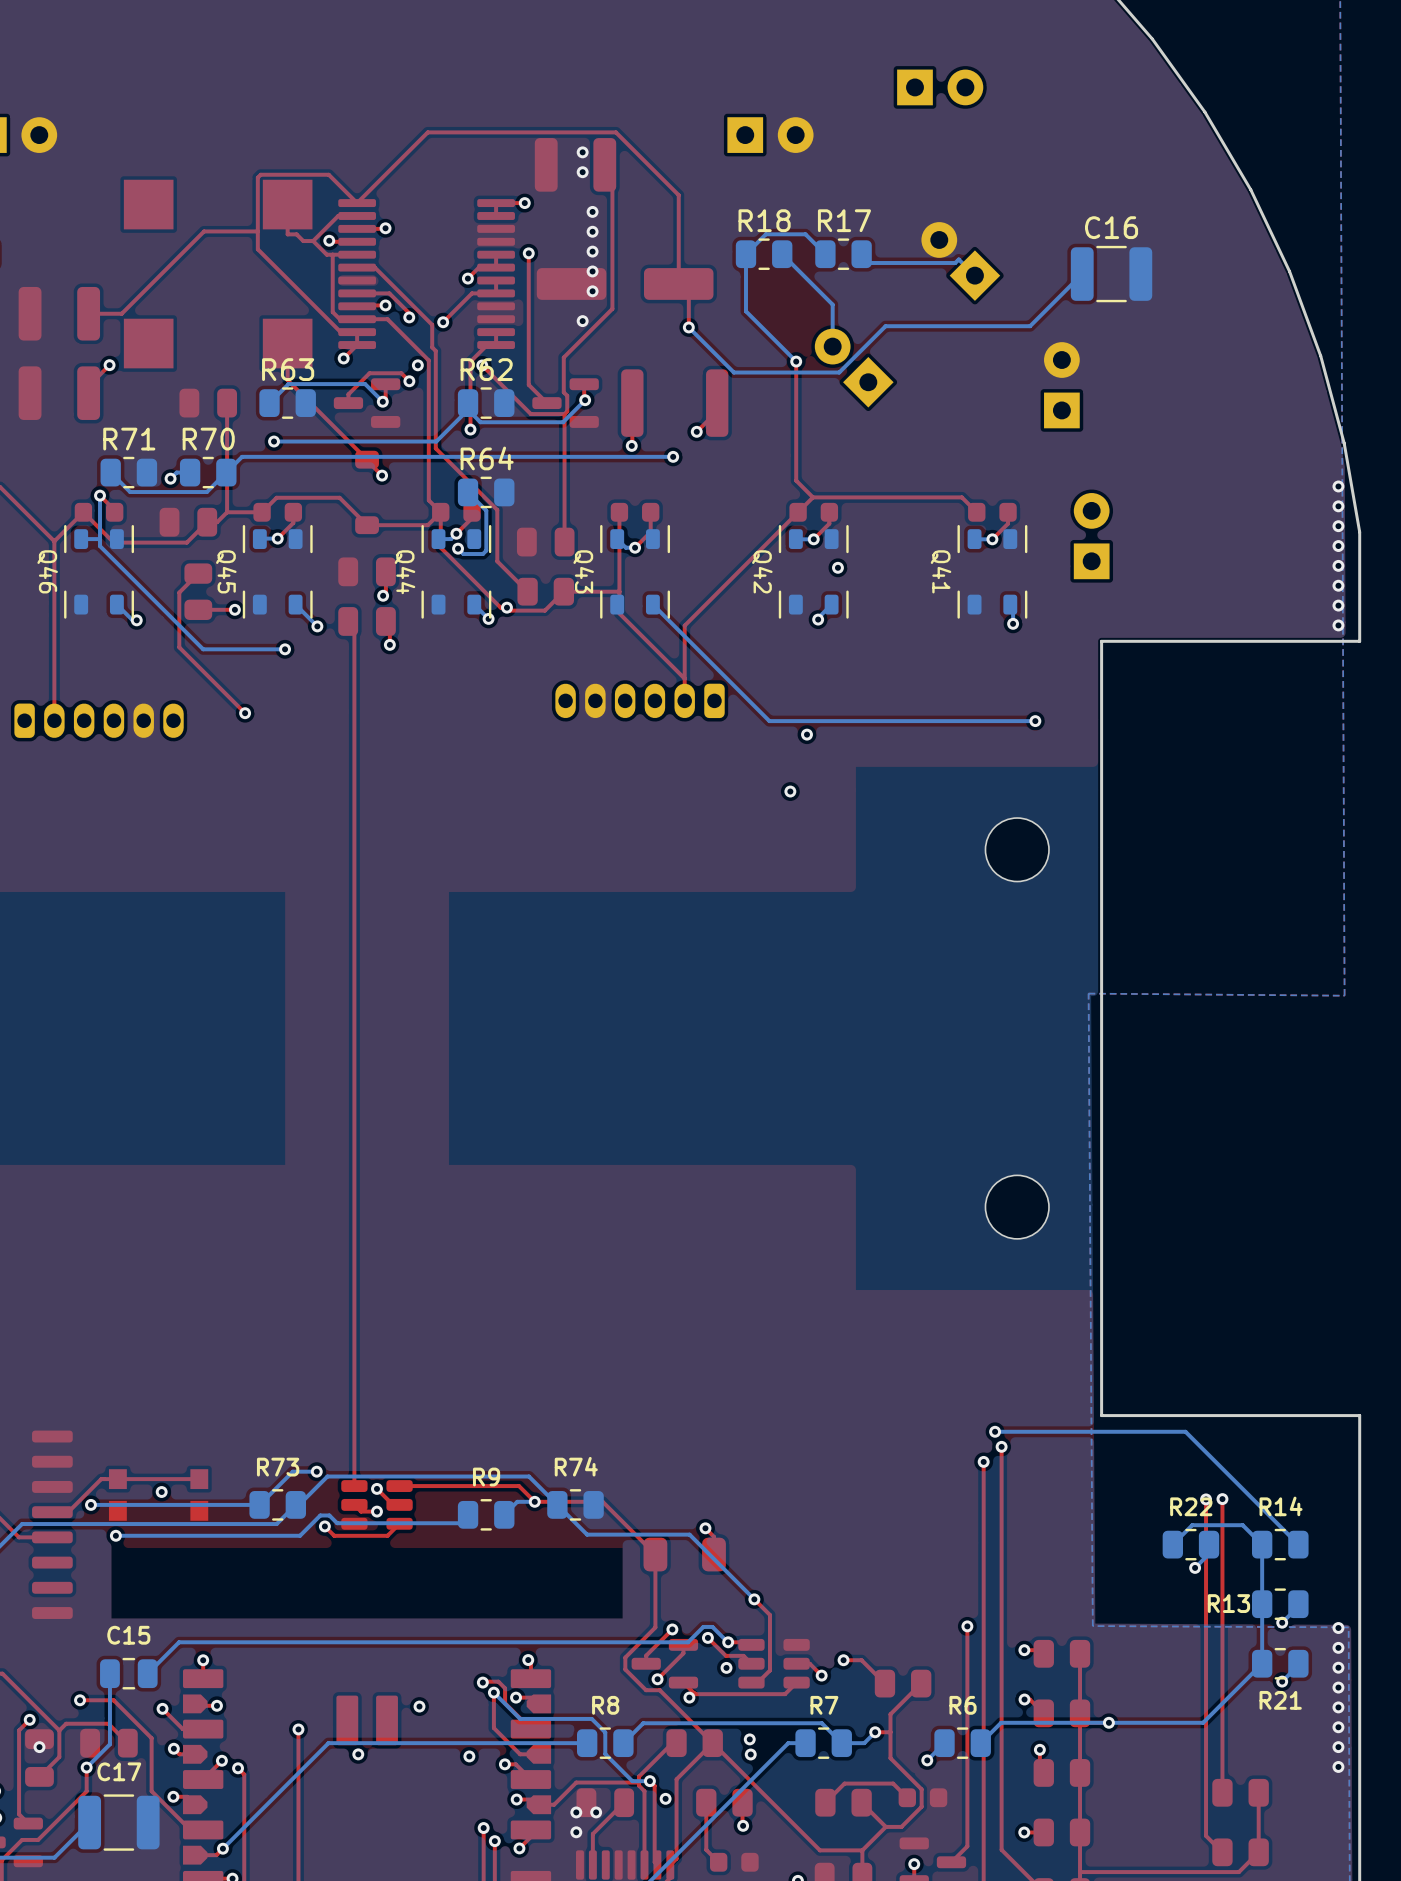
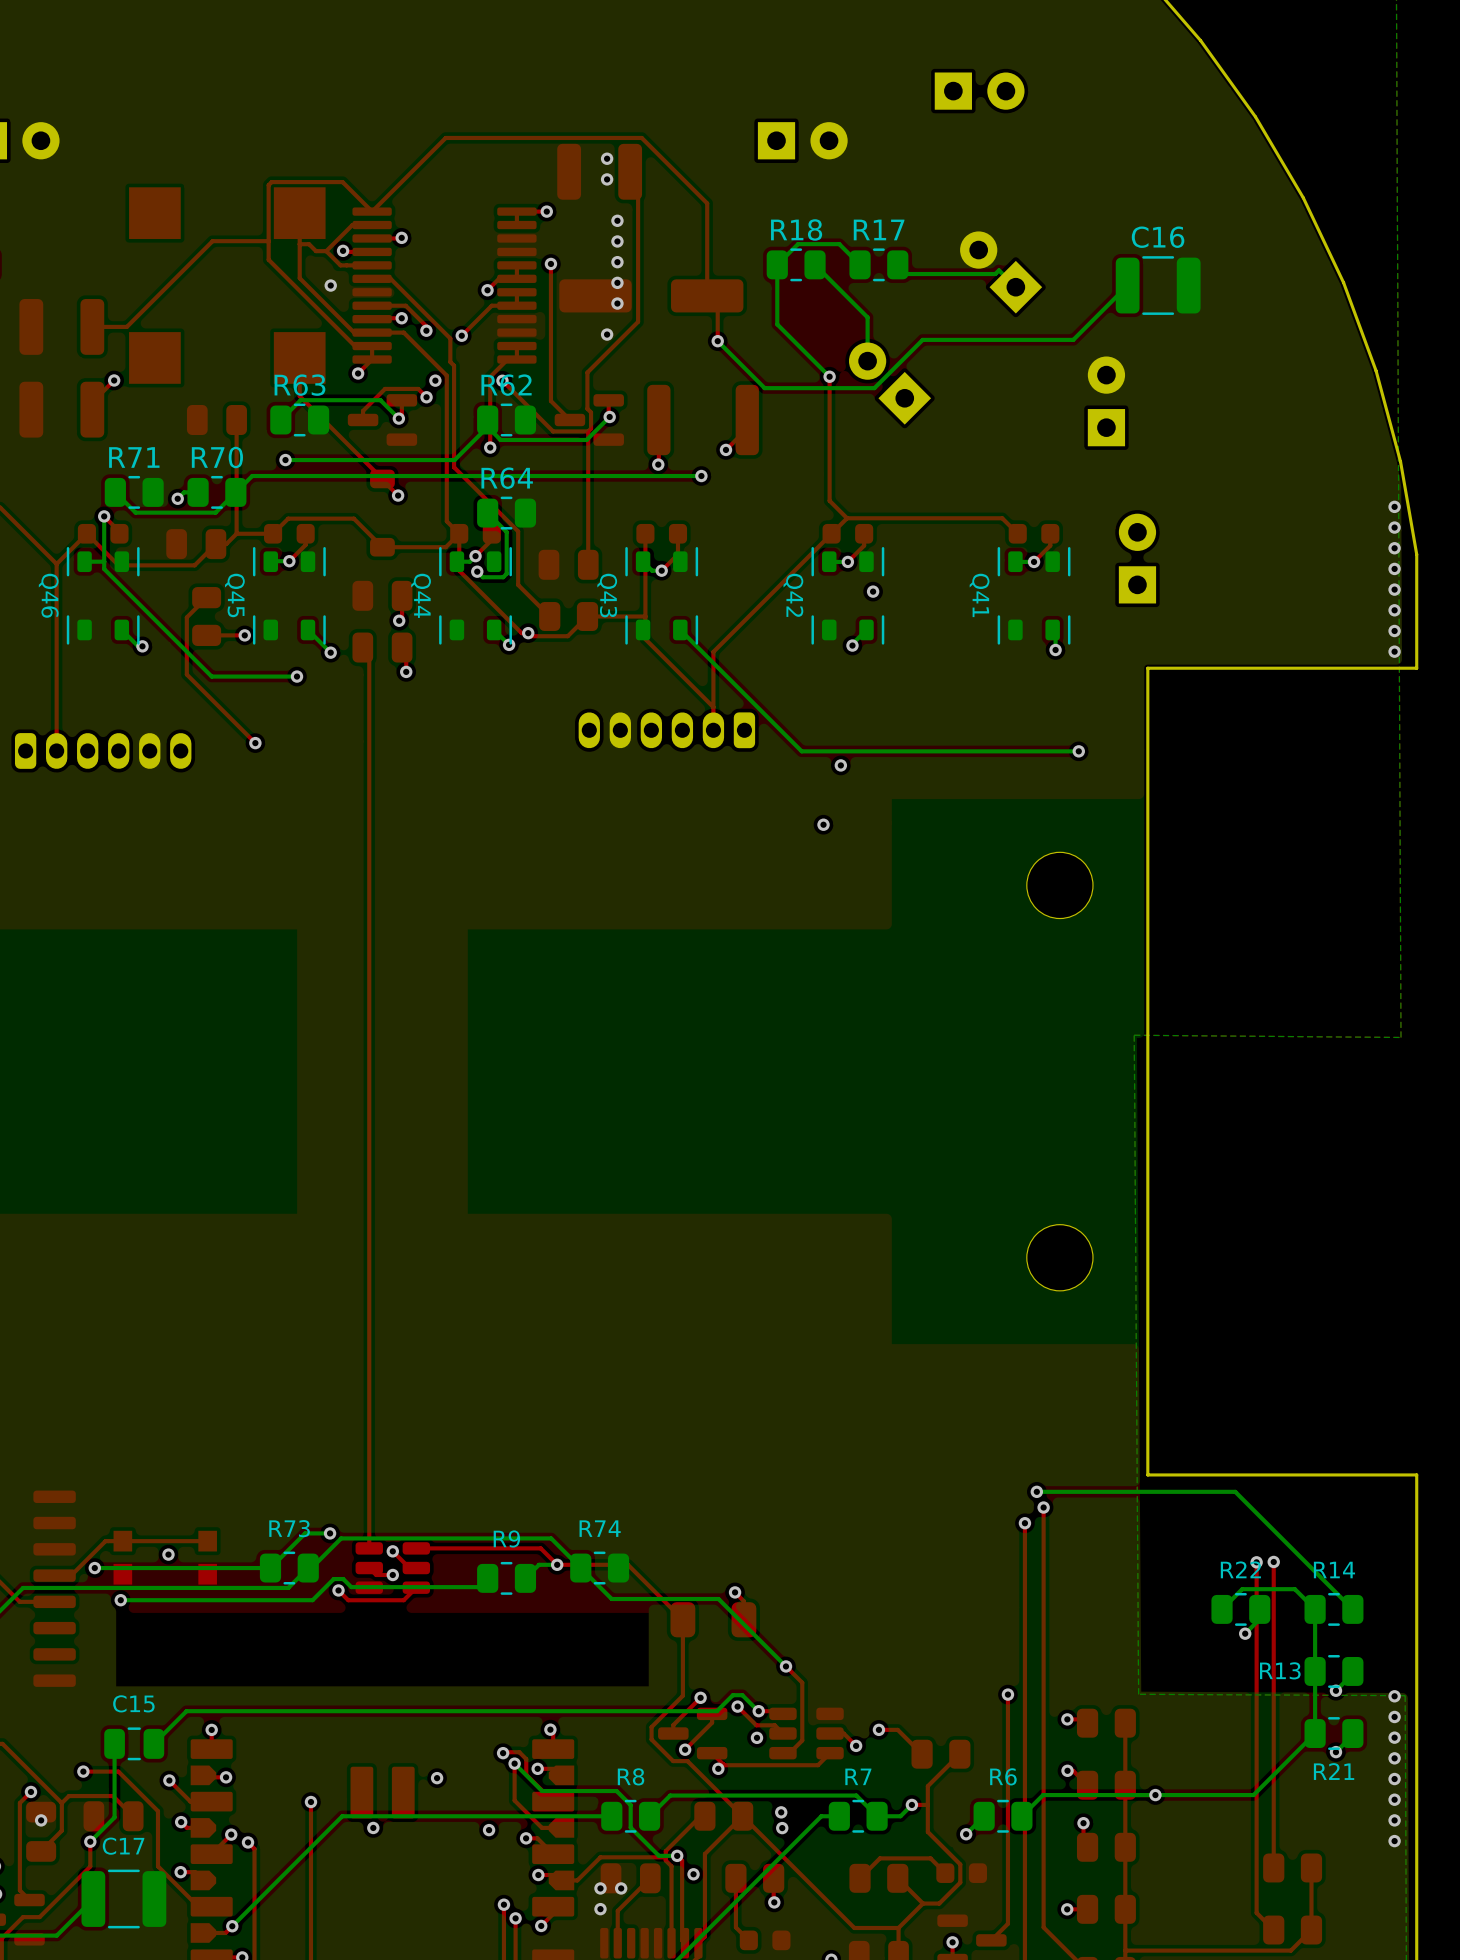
top track: (332, 254) (332, 312) -> (299, 244) (299, 278) (346, 325)
via: none -> (330, 285)

